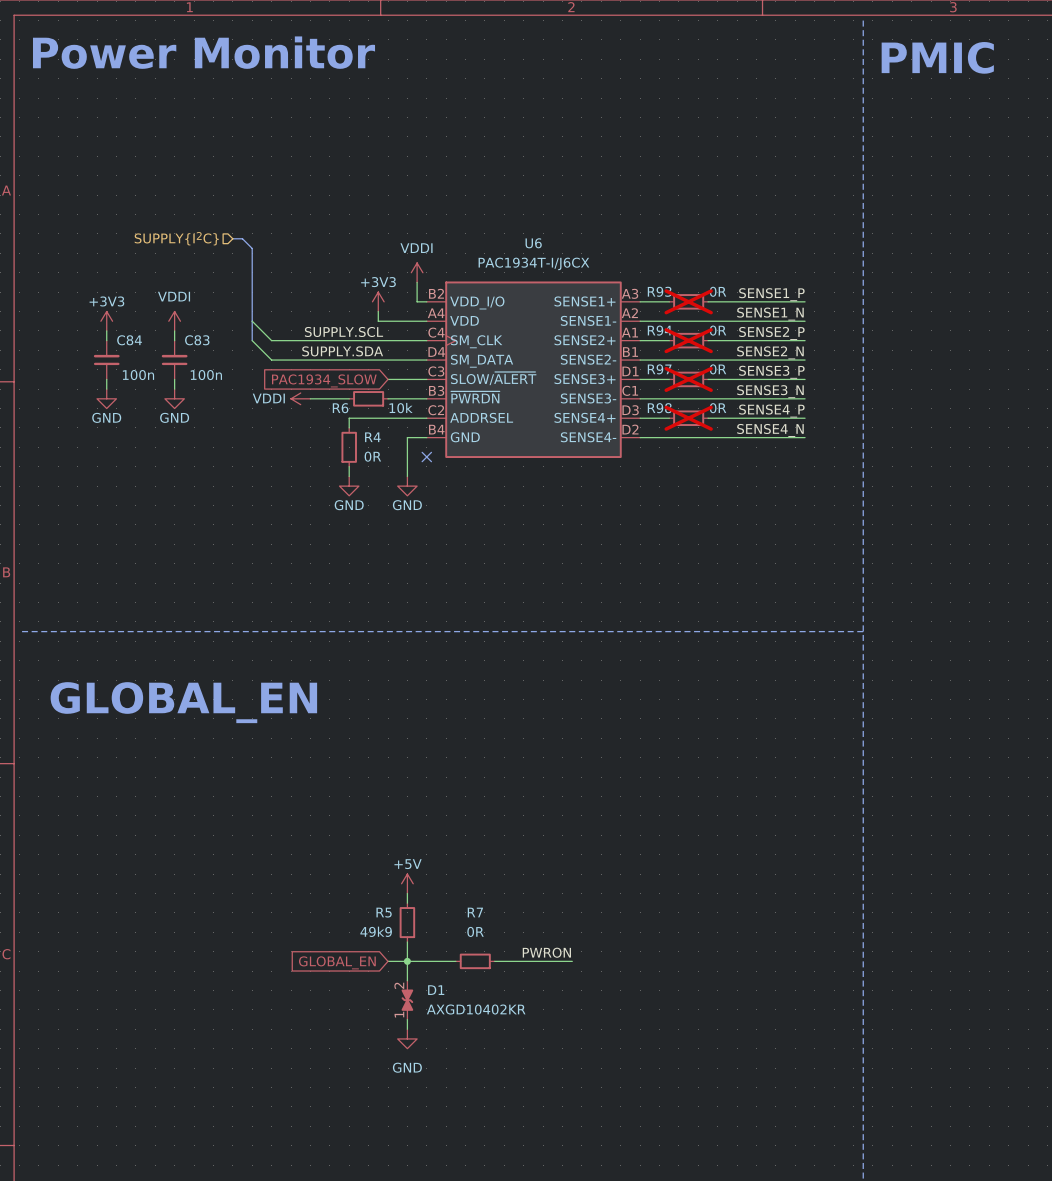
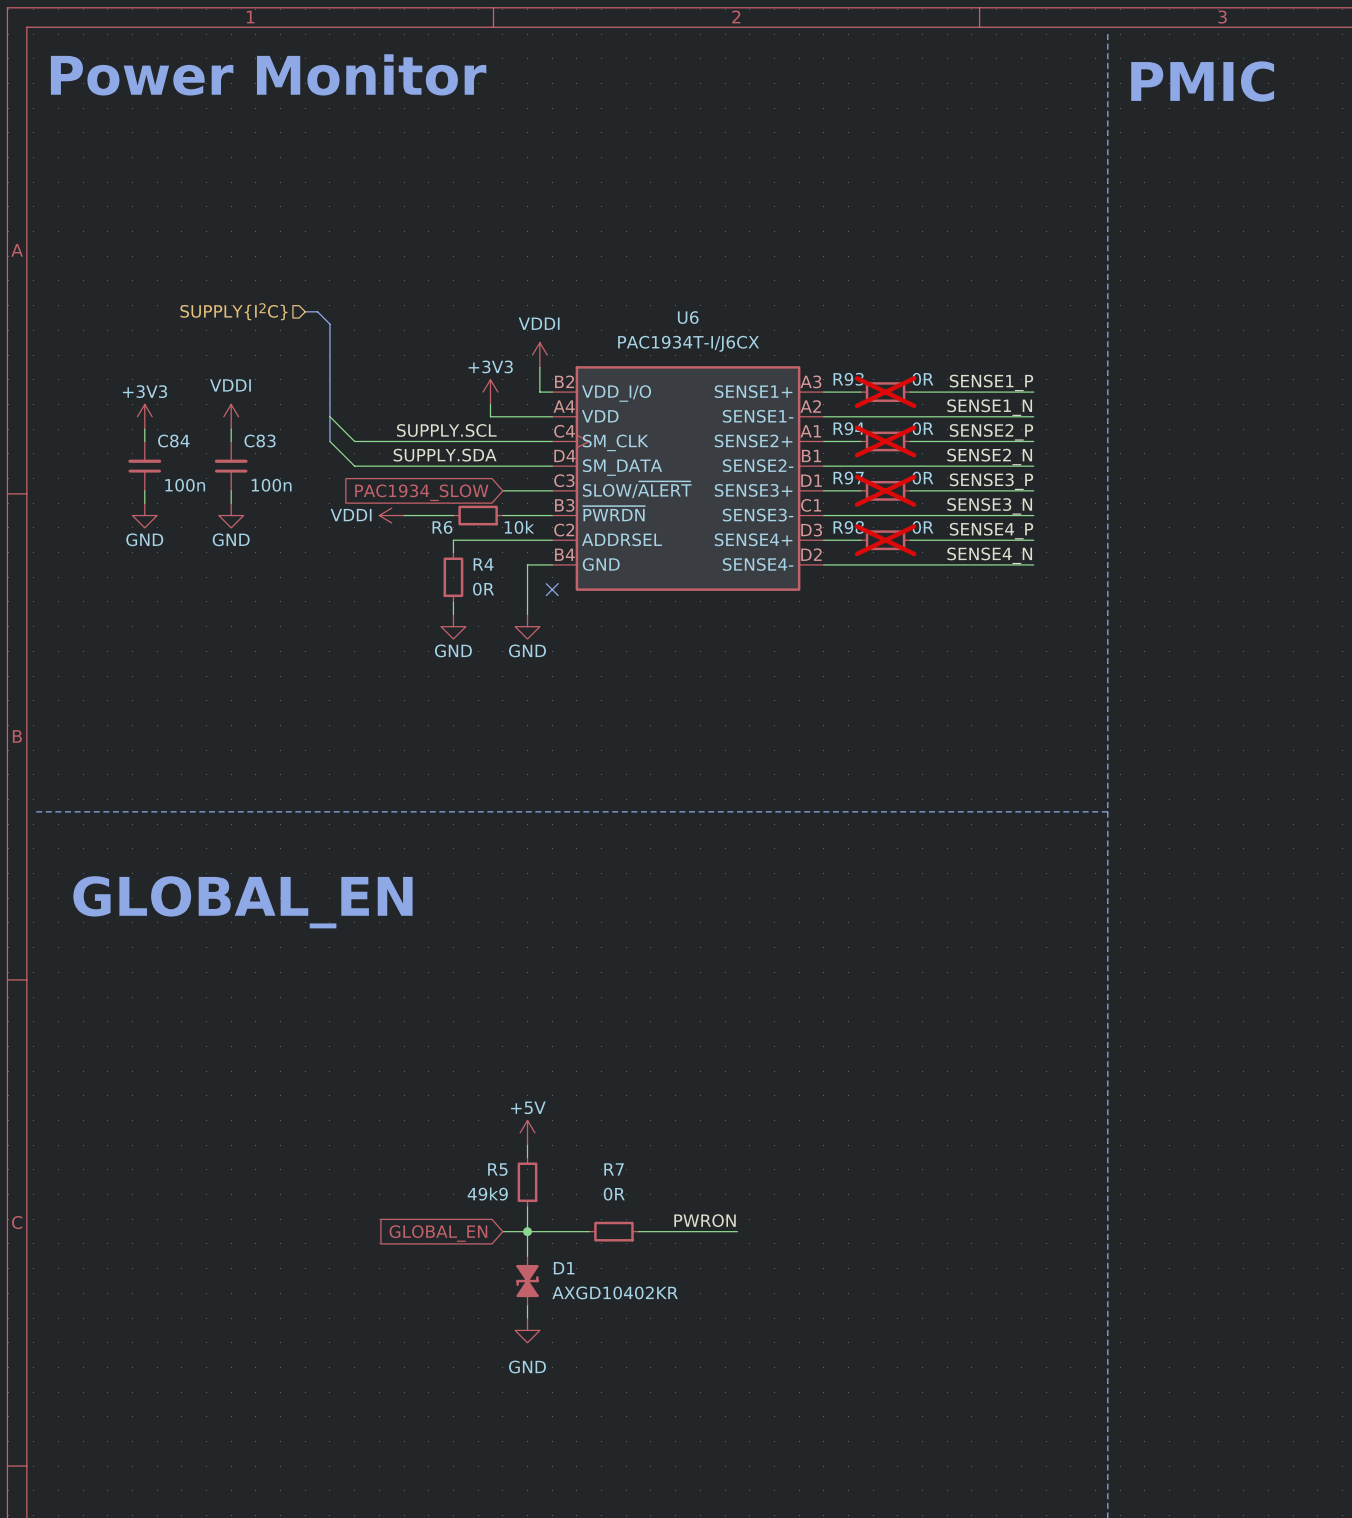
D1 symbol: [401, 980, 414, 1020] -> [516, 1256, 539, 1306]

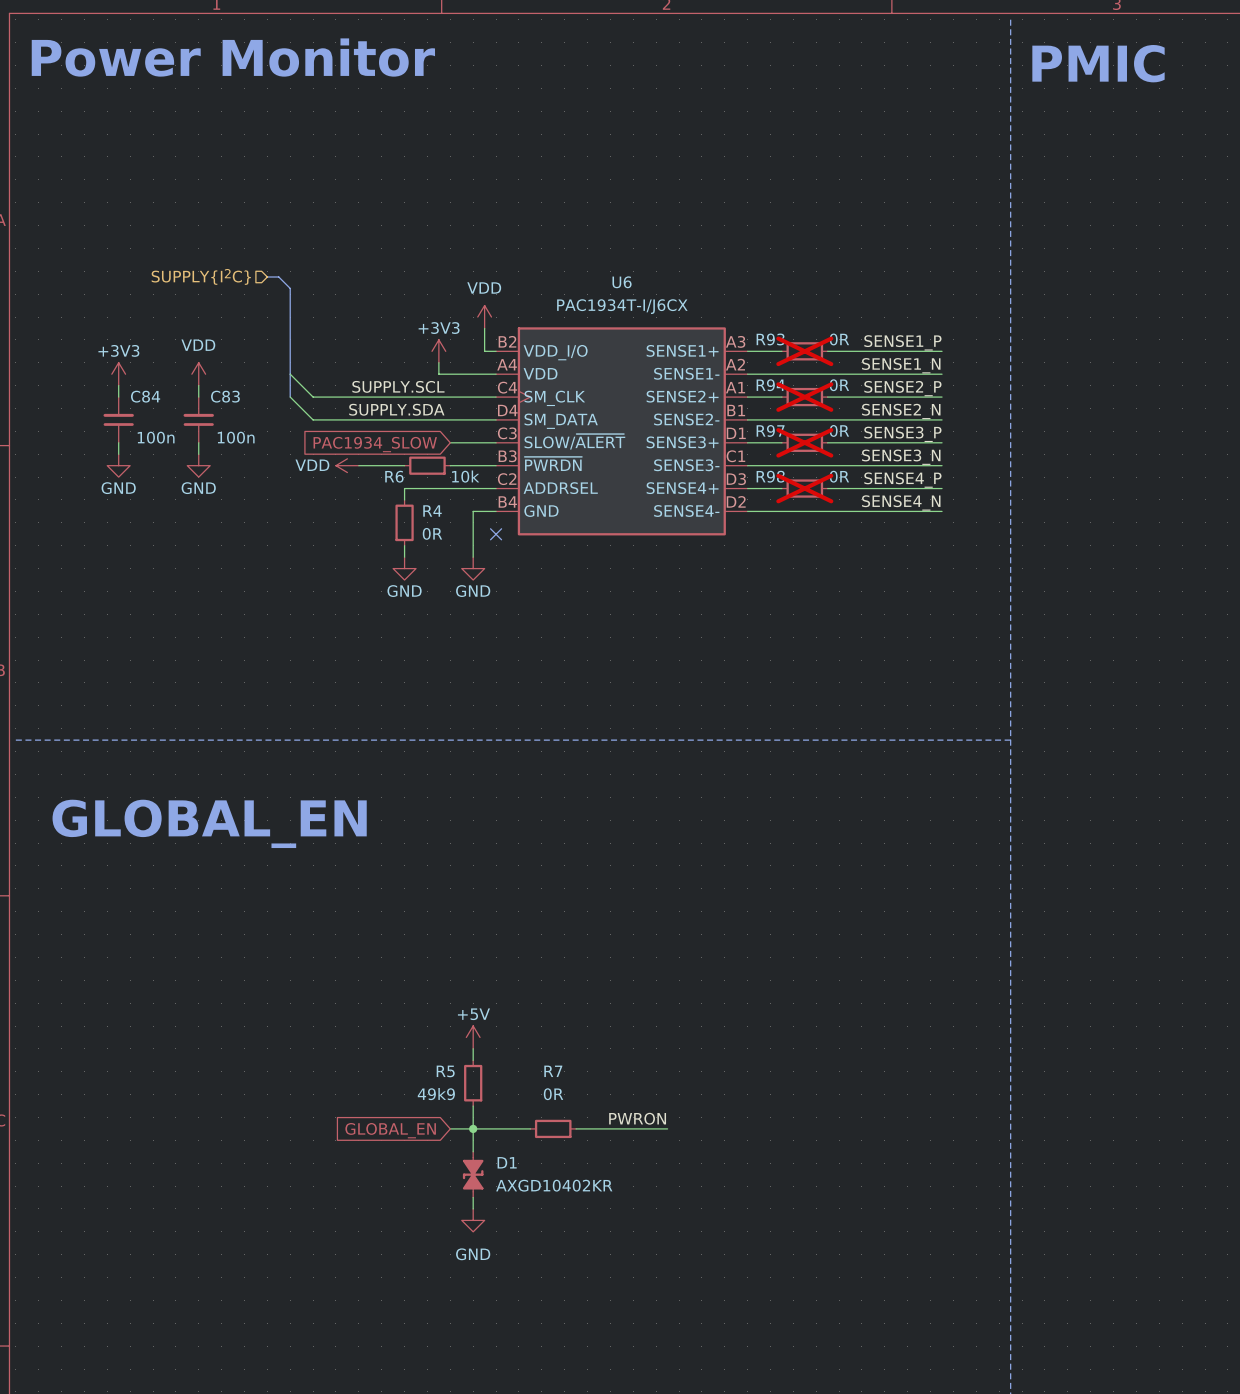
power symbol: VDDI (539, 355) -> VDD (484, 317)
power symbol: VDDI (231, 416) -> VDD (198, 374)
power symbol: VDDI (391, 515) -> VDD (347, 465)

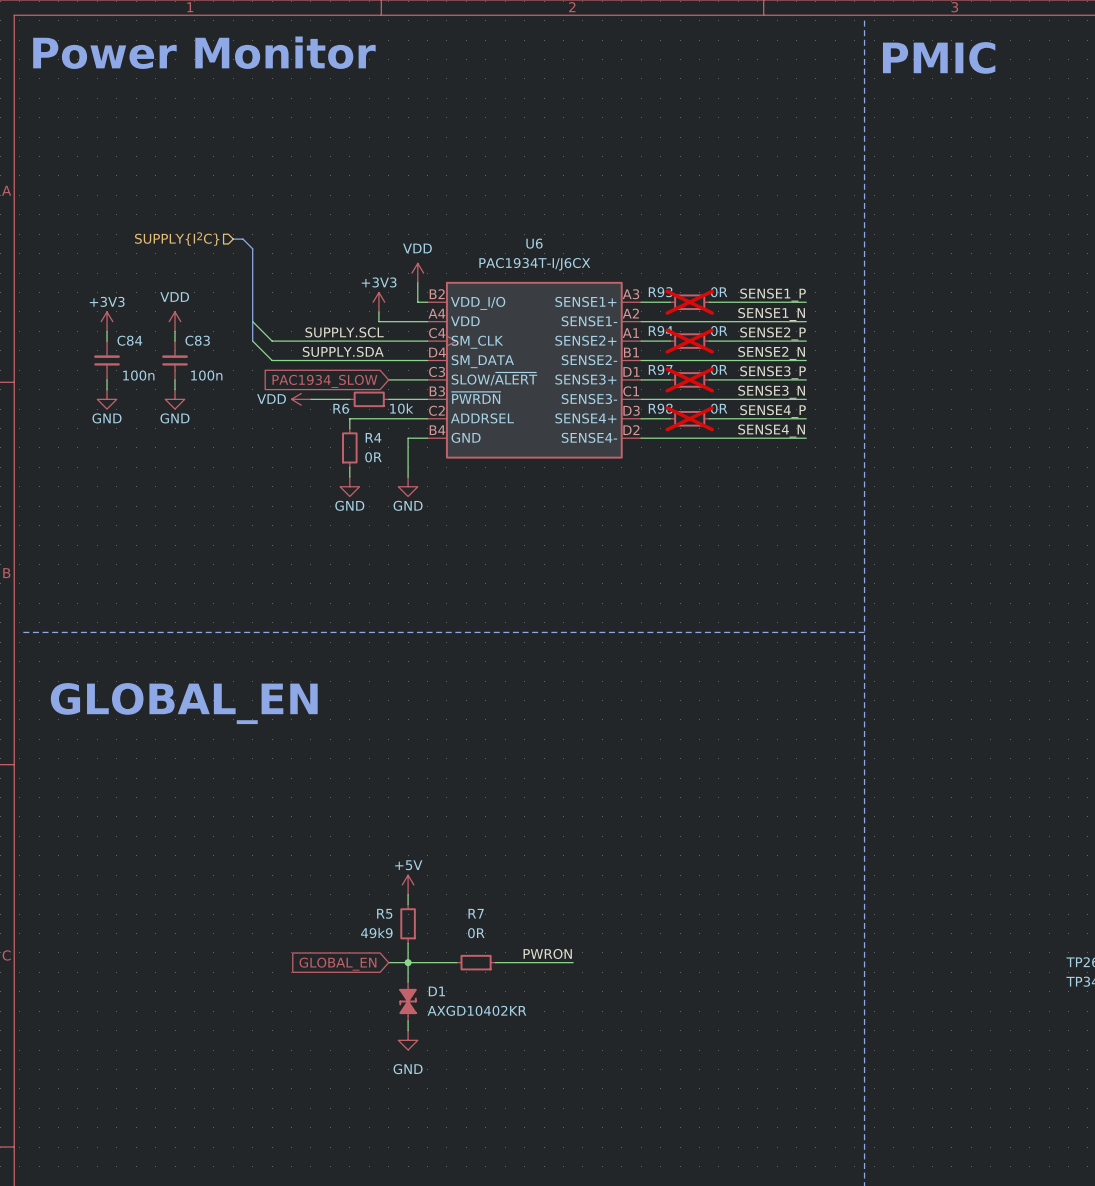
no-connect mark: (496, 534) -> none

